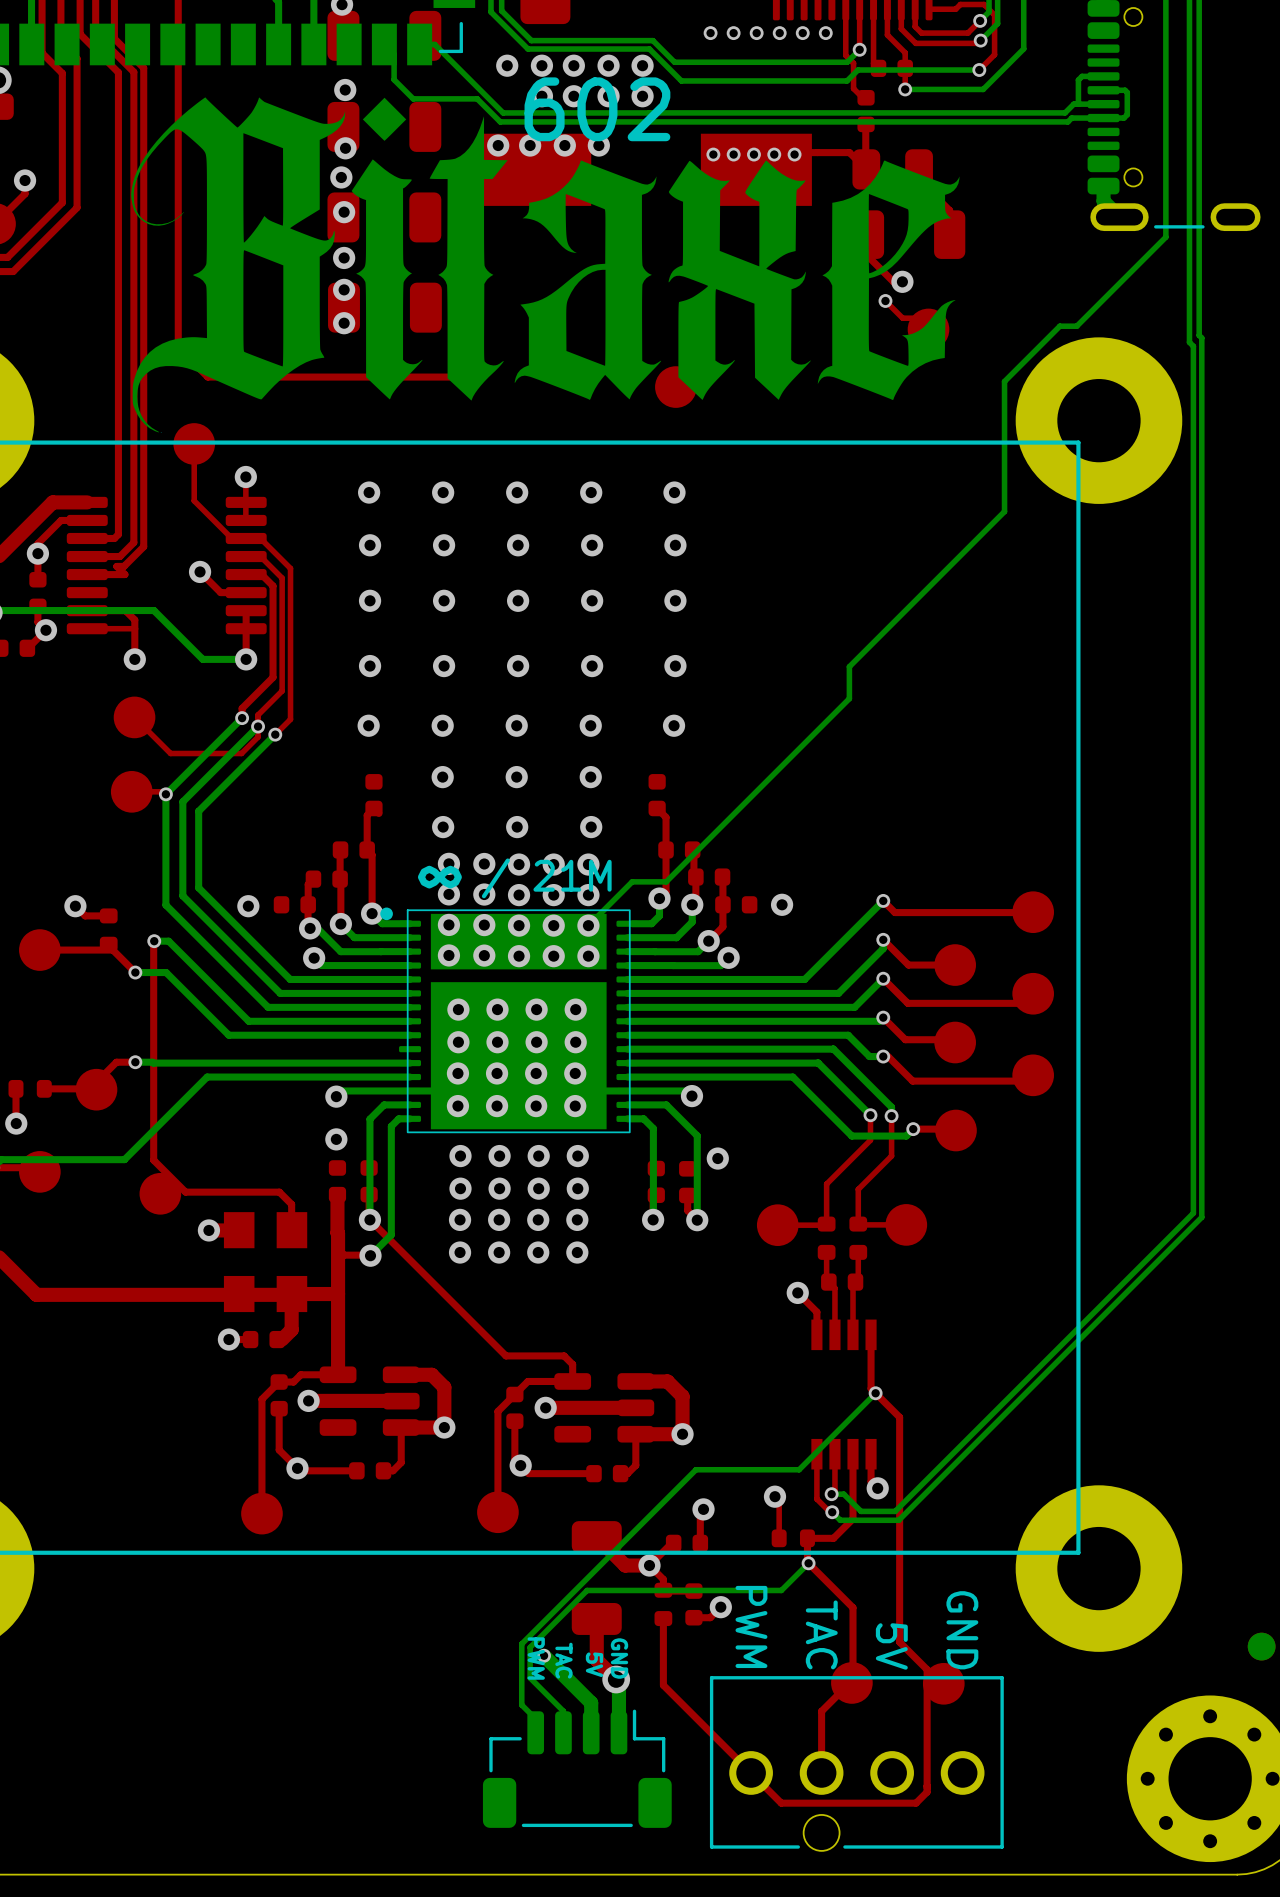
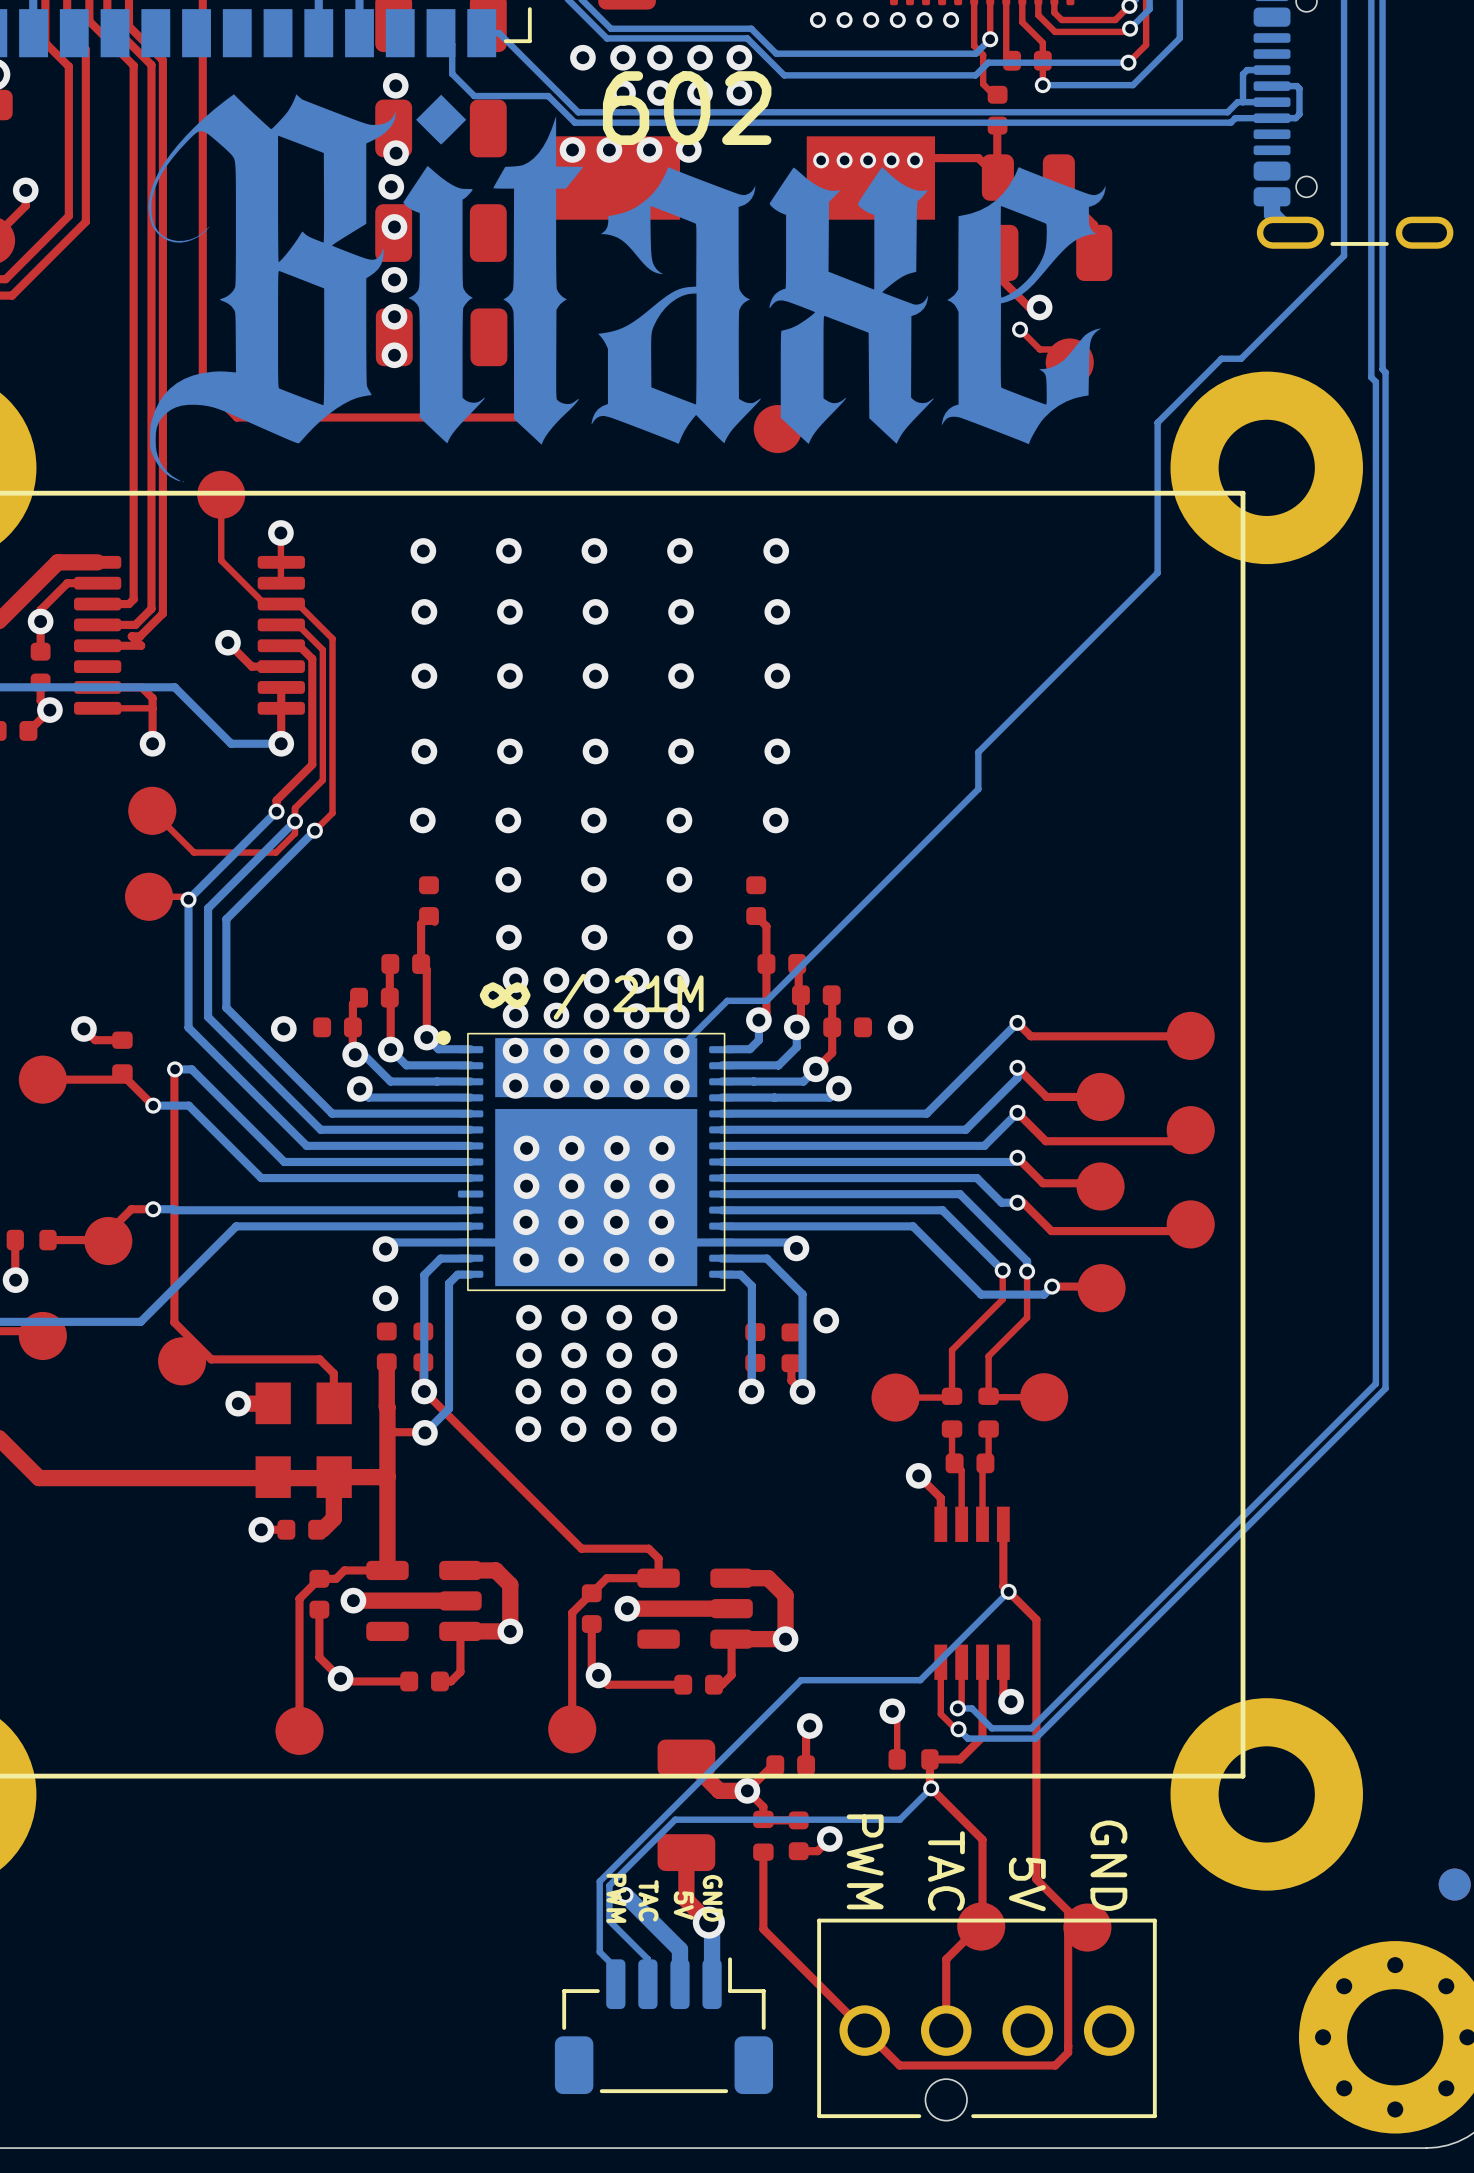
part footprint: [380, 907, 639, 1134] -> [436, 1030, 735, 1292]

